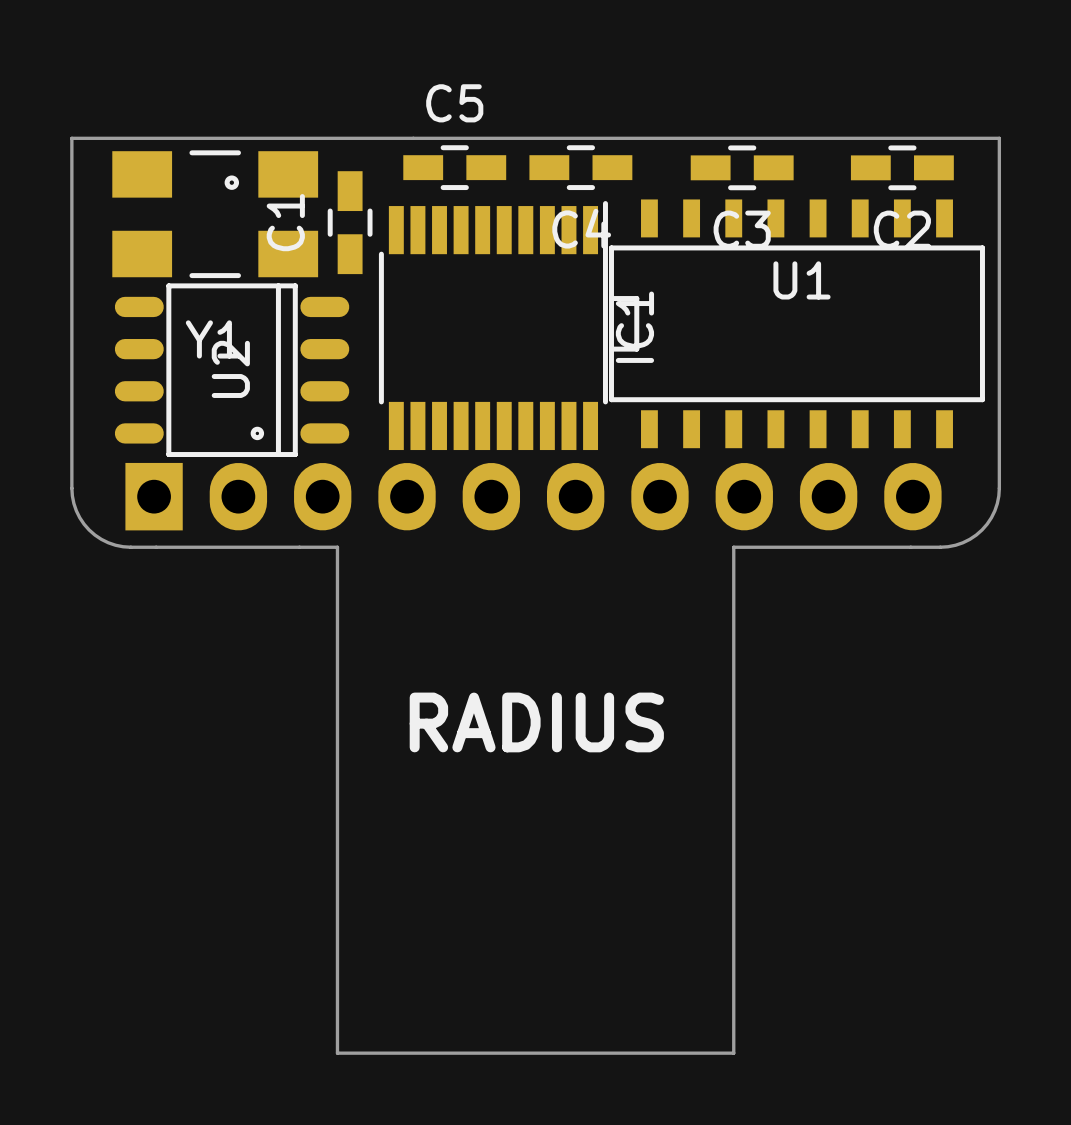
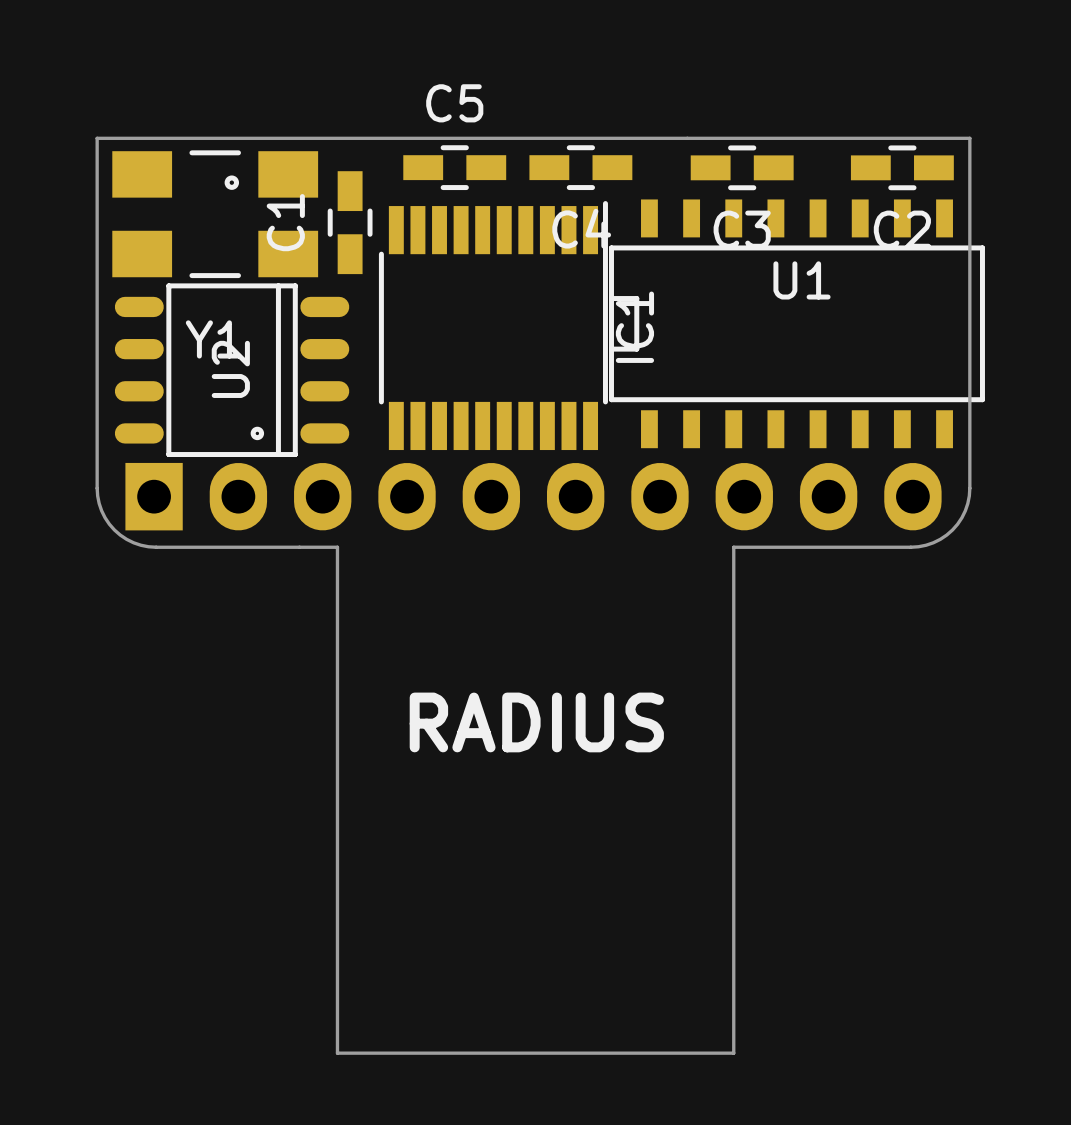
board edge: (97, 138) (71, 138) (72, 495) (79, 517) (89, 529) (101, 539) (123, 546) (156, 547) -> (97, 138) (97, 495) (105, 517) (120, 535) (140, 545) (156, 547)
board edge: (969, 138) (999, 138) (998, 495) (991, 517) (982, 529) (969, 539) (948, 546) (910, 547) -> (969, 138) (969, 495) (965, 510) (952, 529) (933, 542) (910, 547)

